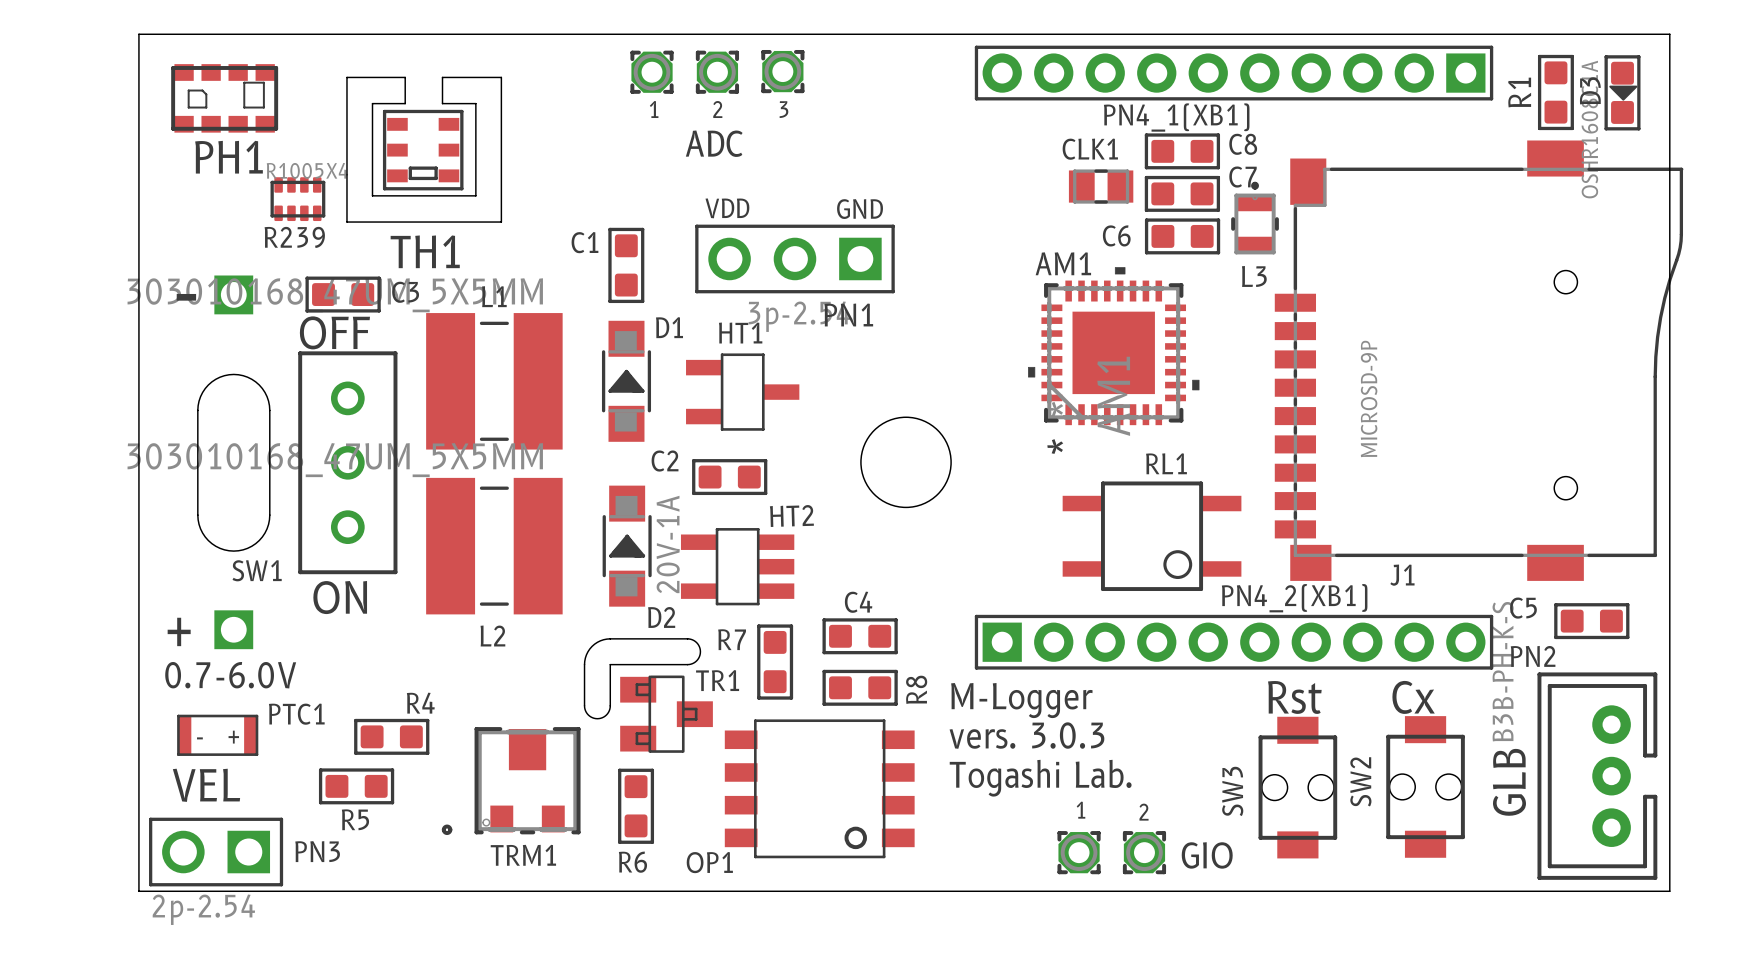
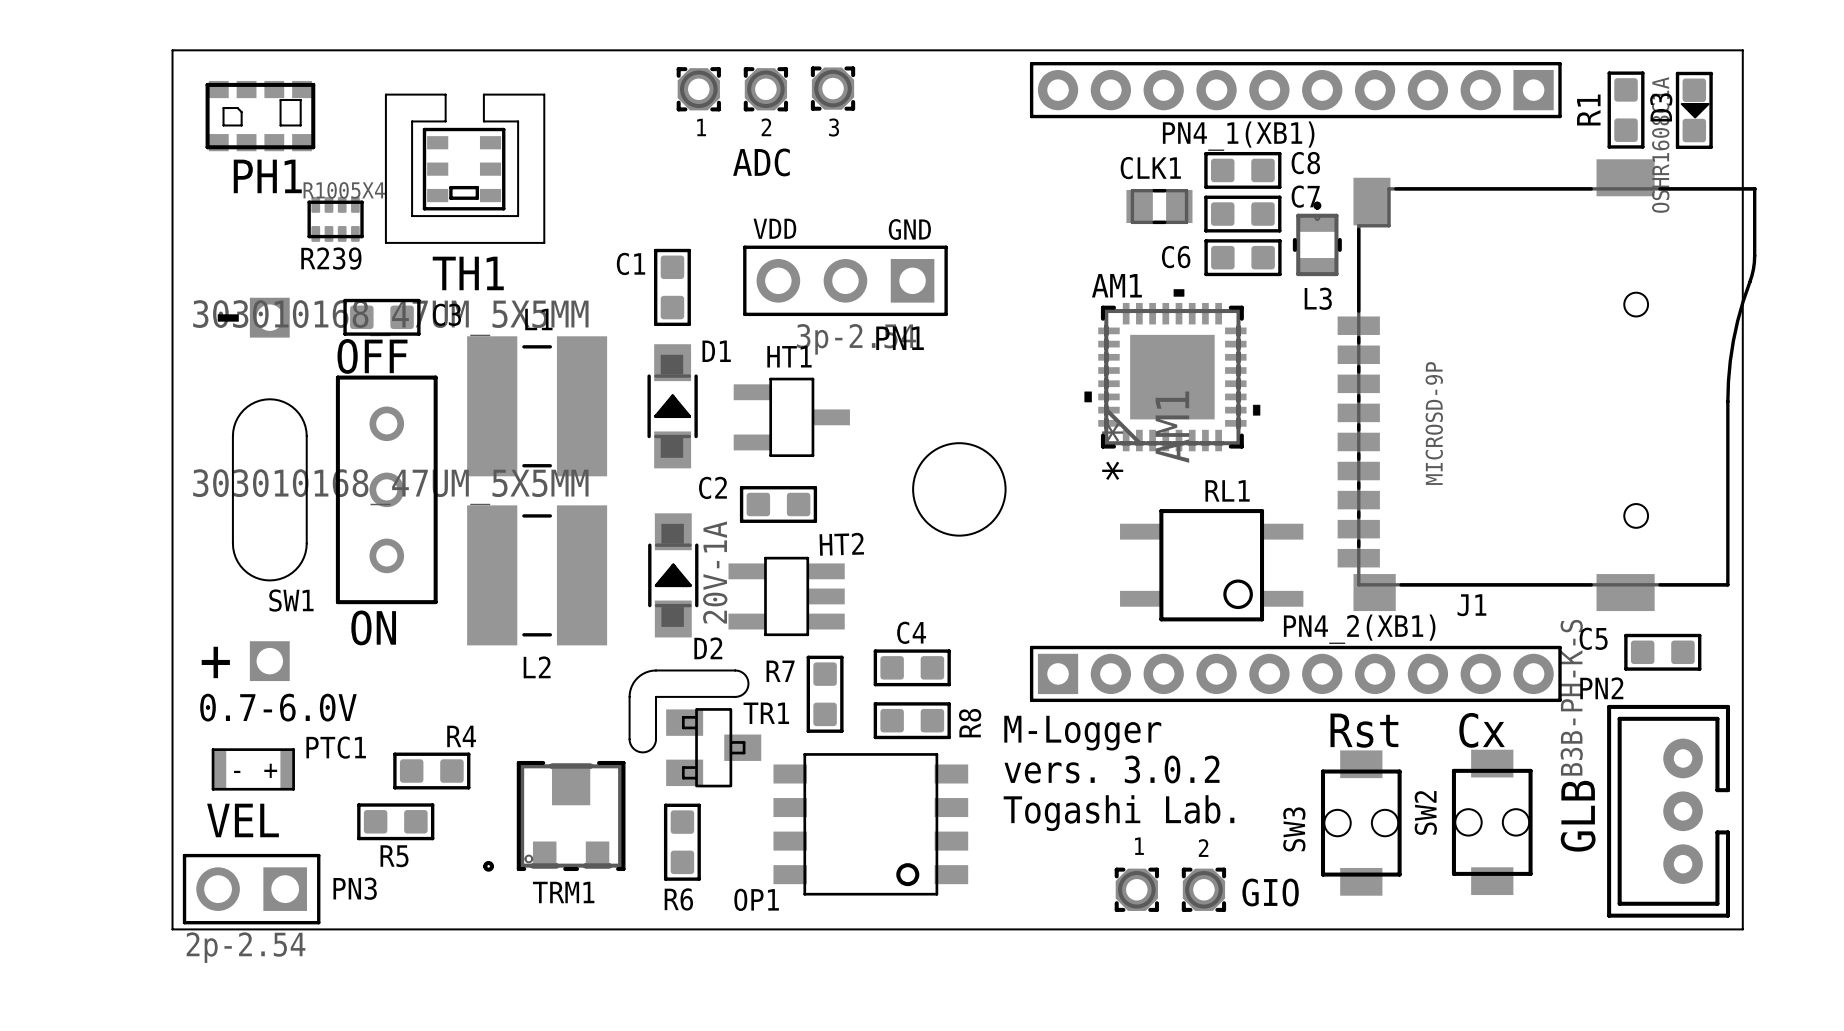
text: vers. 3.0.3 (1026, 735) -> vers. 3.0.2 (1112, 769)

